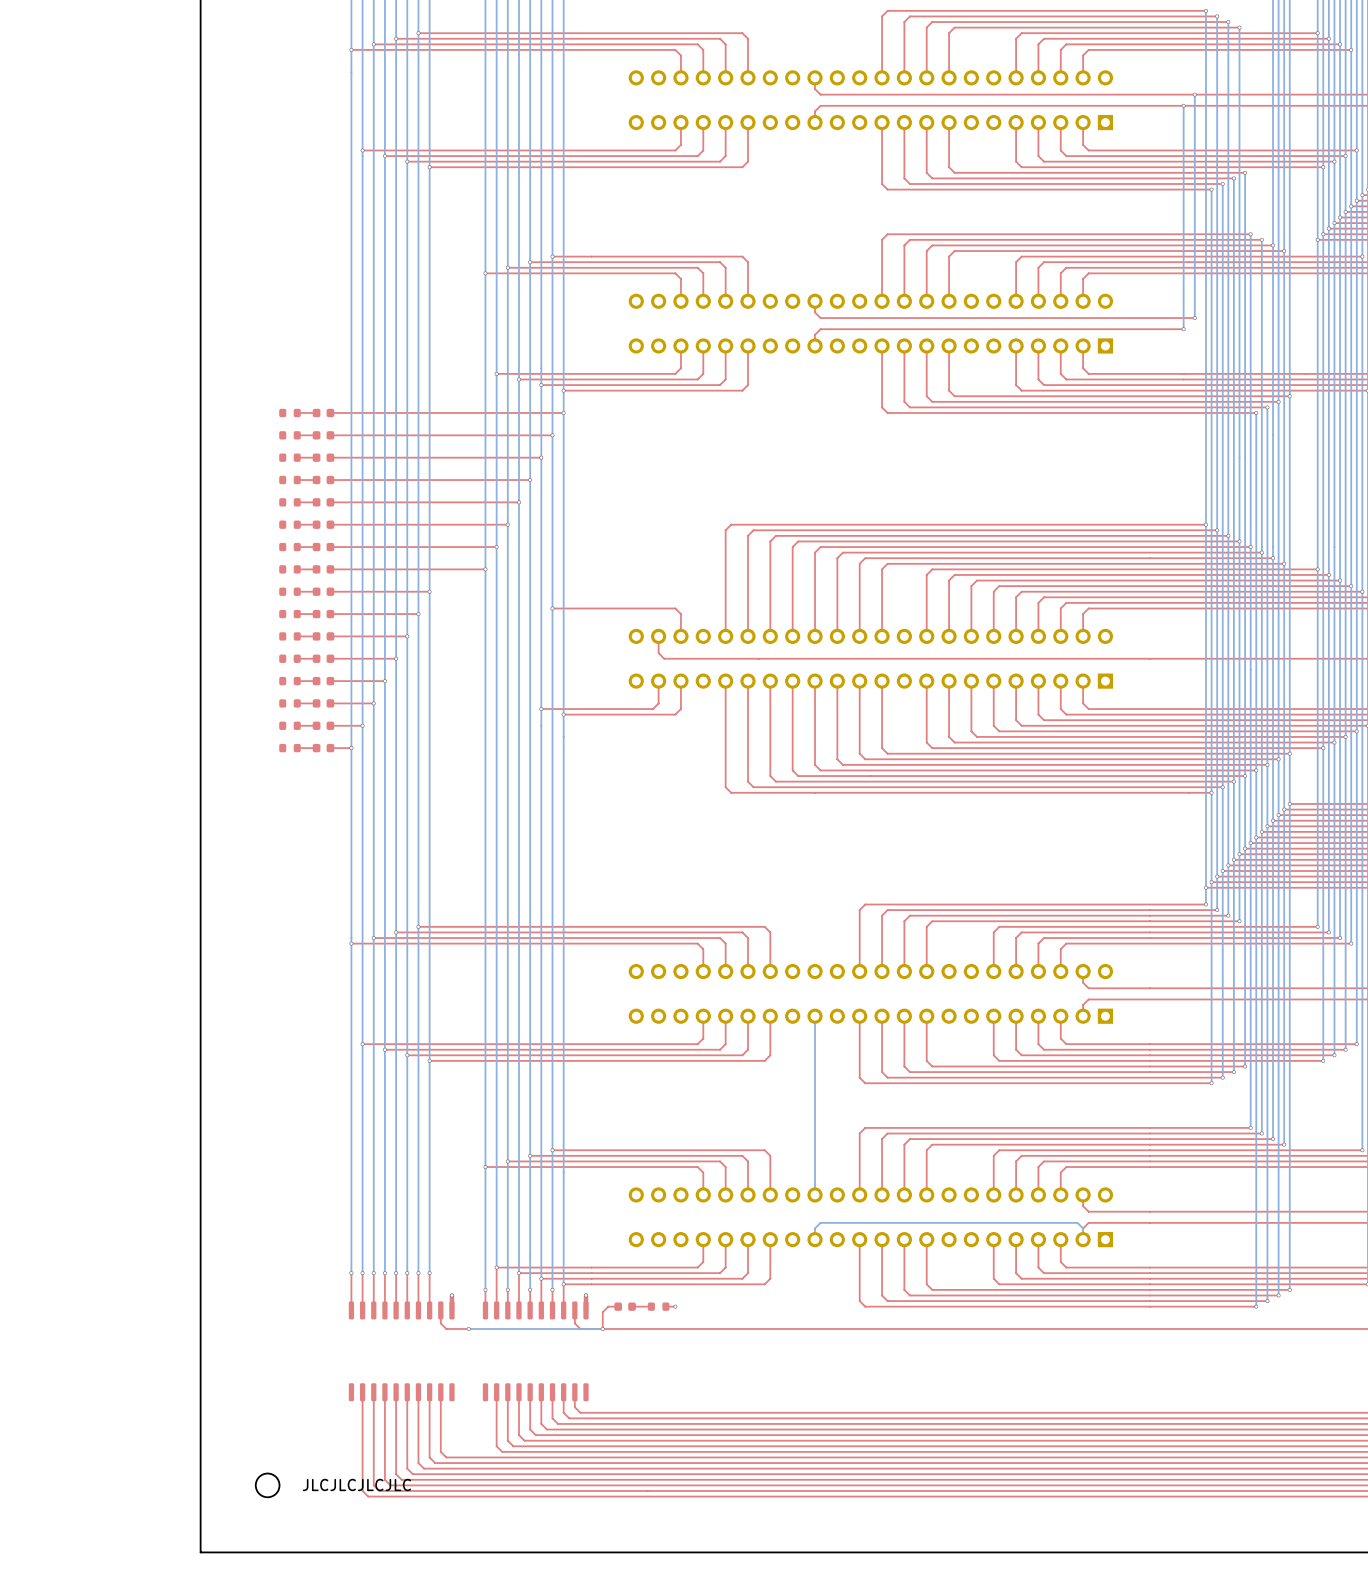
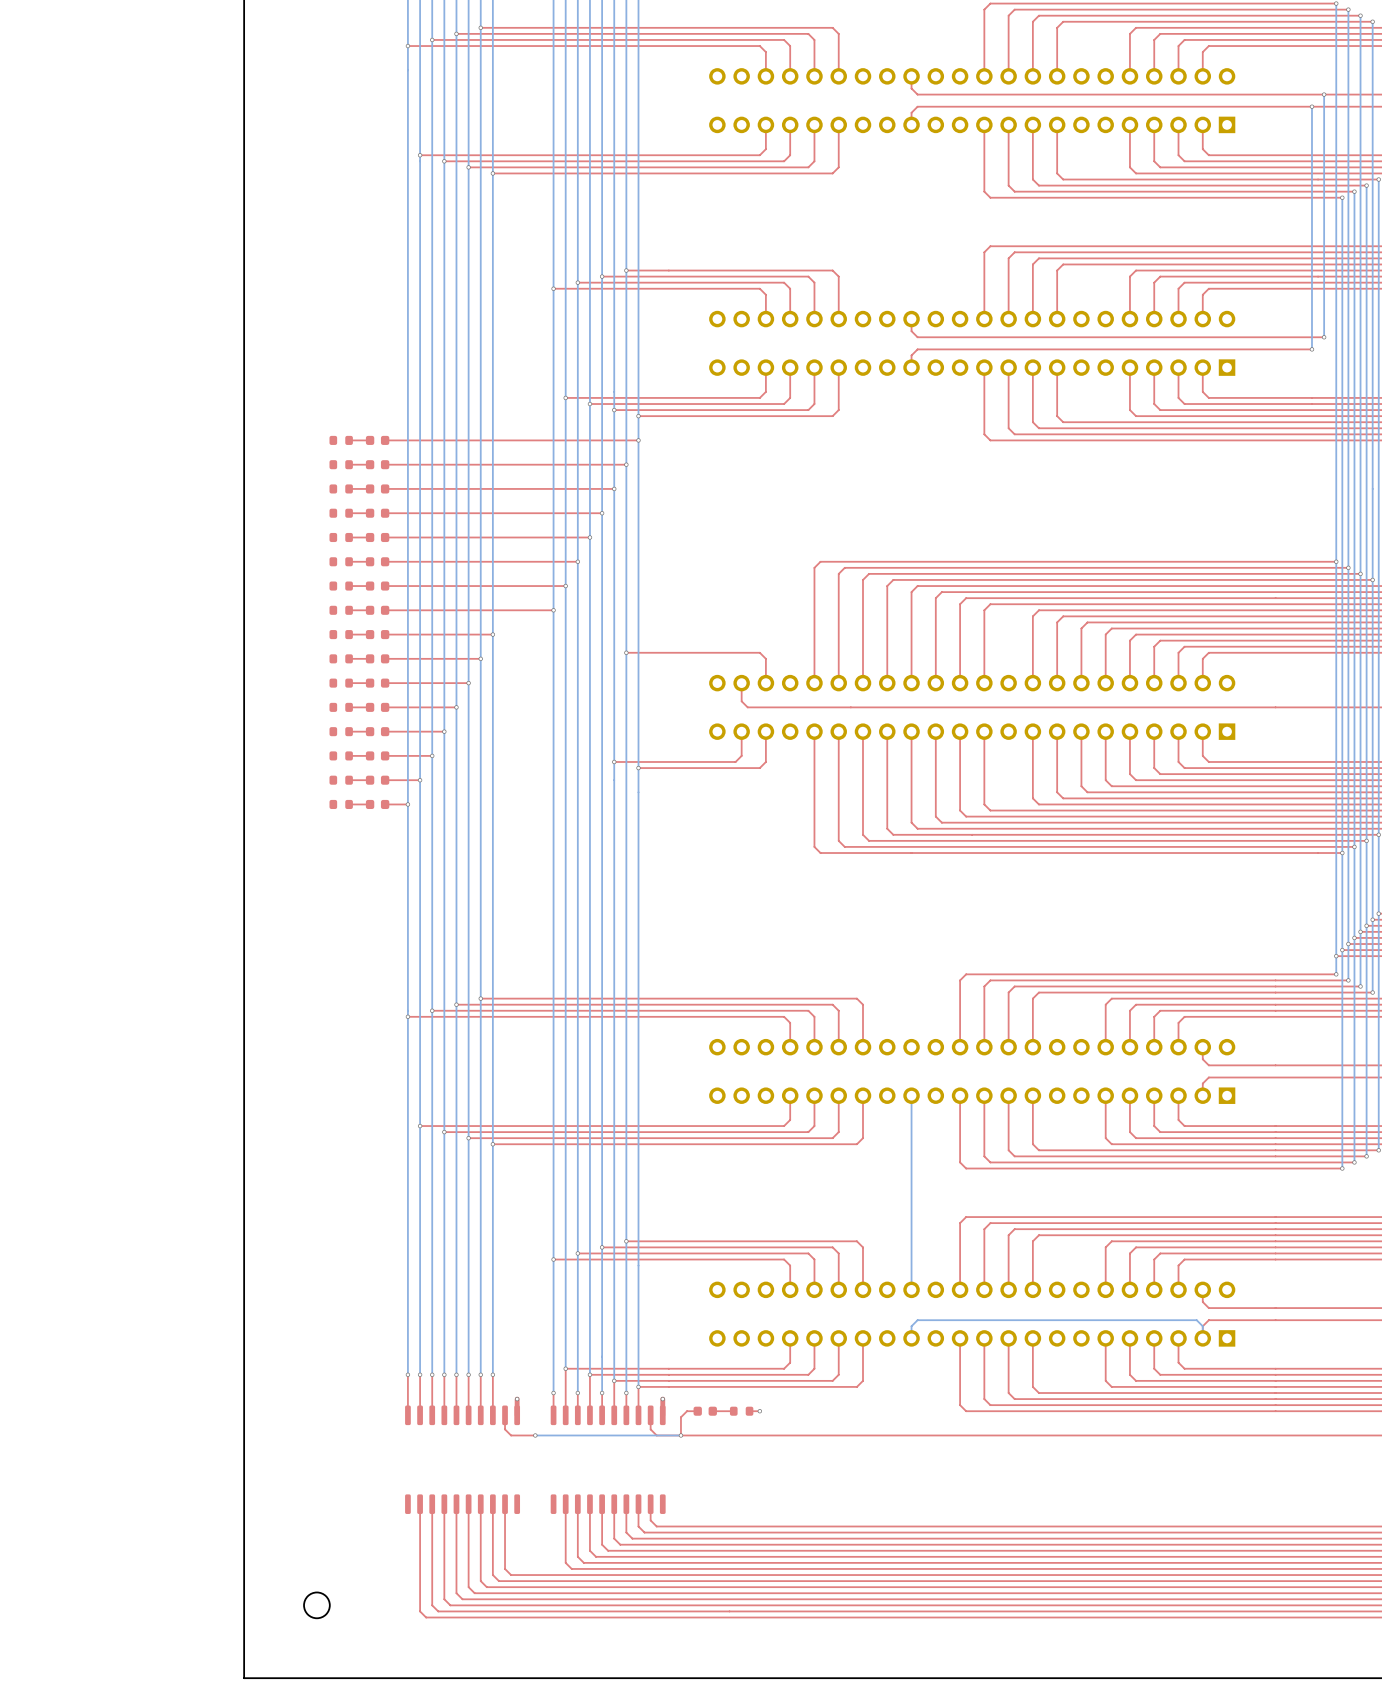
text: JLCJLCJLCJLC (356, 1484) -> none

